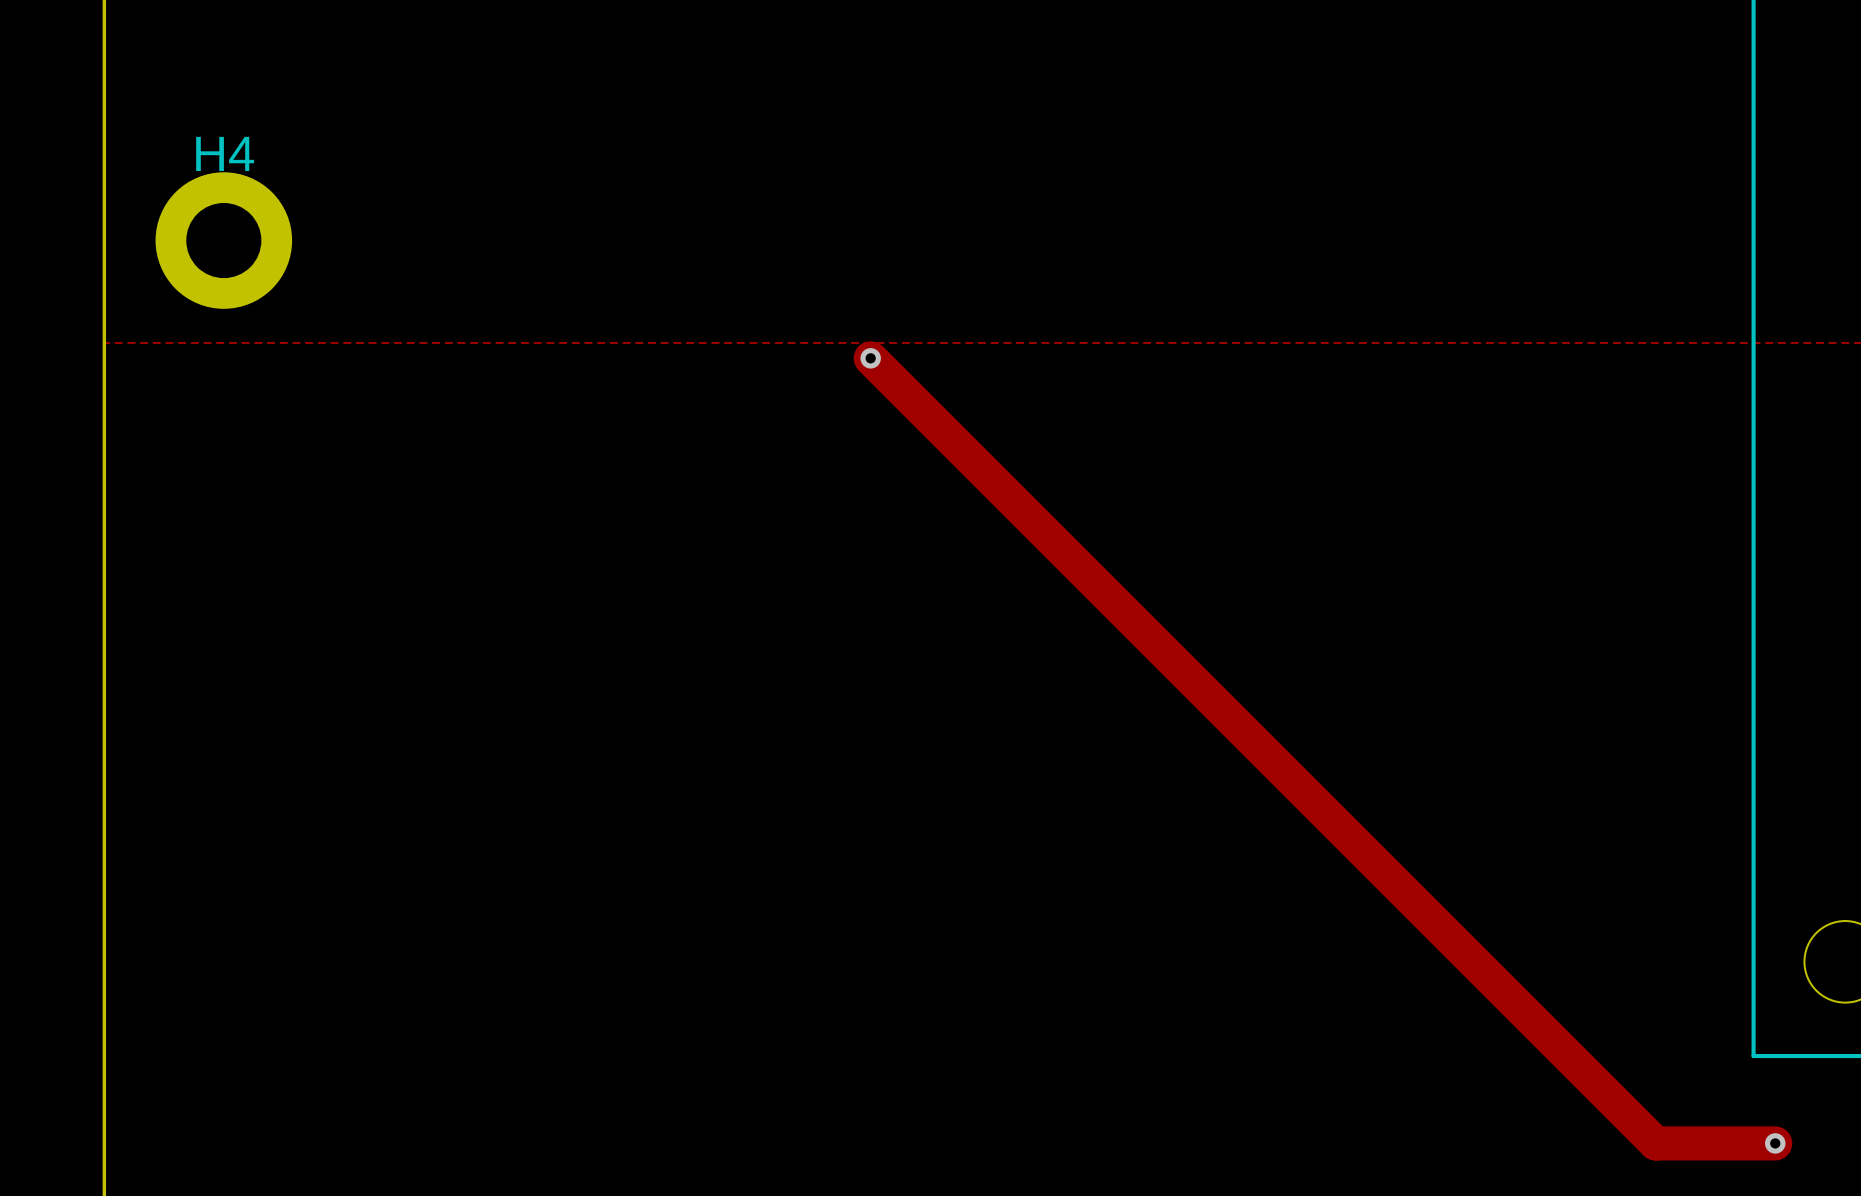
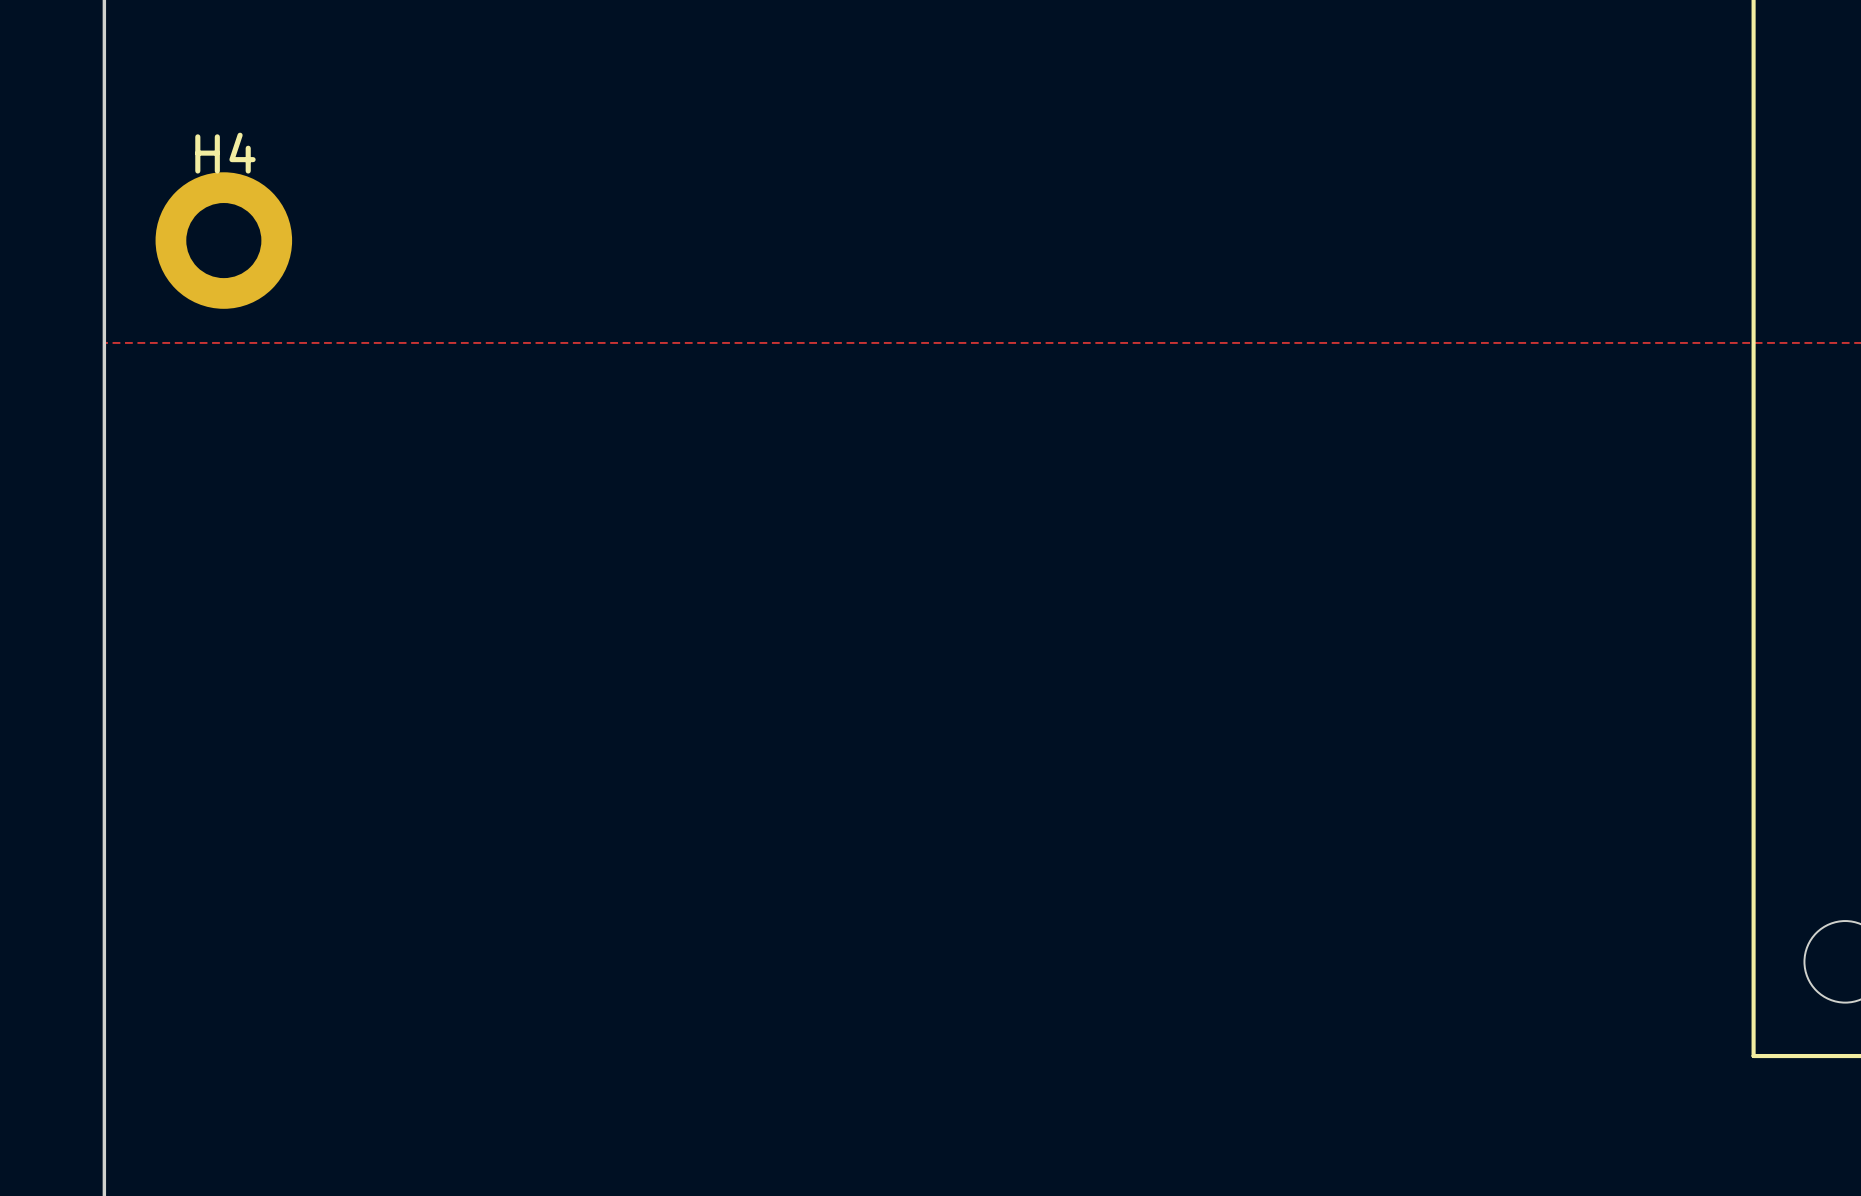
track: (870, 358) (1655, 1143) (1775, 1143) -> none
via: (870, 358) -> none
via: (1775, 1143) -> none

